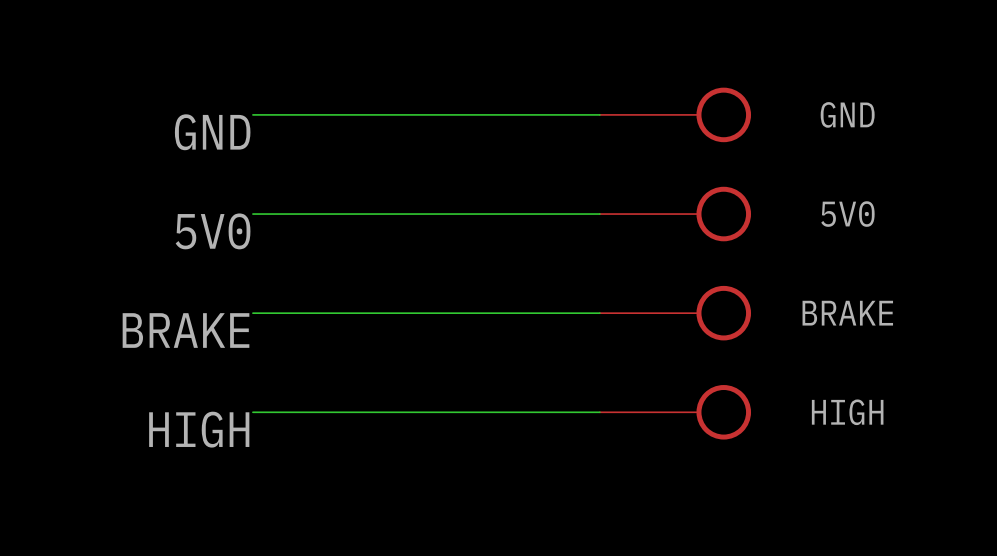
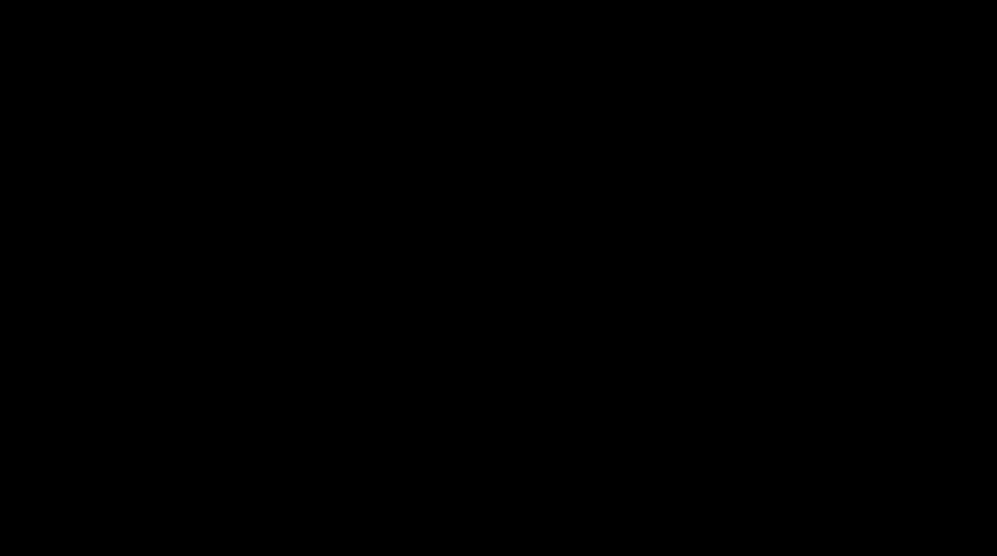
wire: (252, 114) (599, 114) -> none
GND: (675, 114) -> none
label: GND (212, 132) -> none
wire: (252, 214) (599, 214) -> none
5V0: (675, 214) -> none
label: 5V0 (213, 231) -> none
wire: (252, 313) (599, 313) -> none
BRAKE: (675, 313) -> none
label: BRAKE (186, 330) -> none
wire: (252, 412) (599, 412) -> none
HIGH: (675, 412) -> none
label: HIGH (199, 429) -> none

